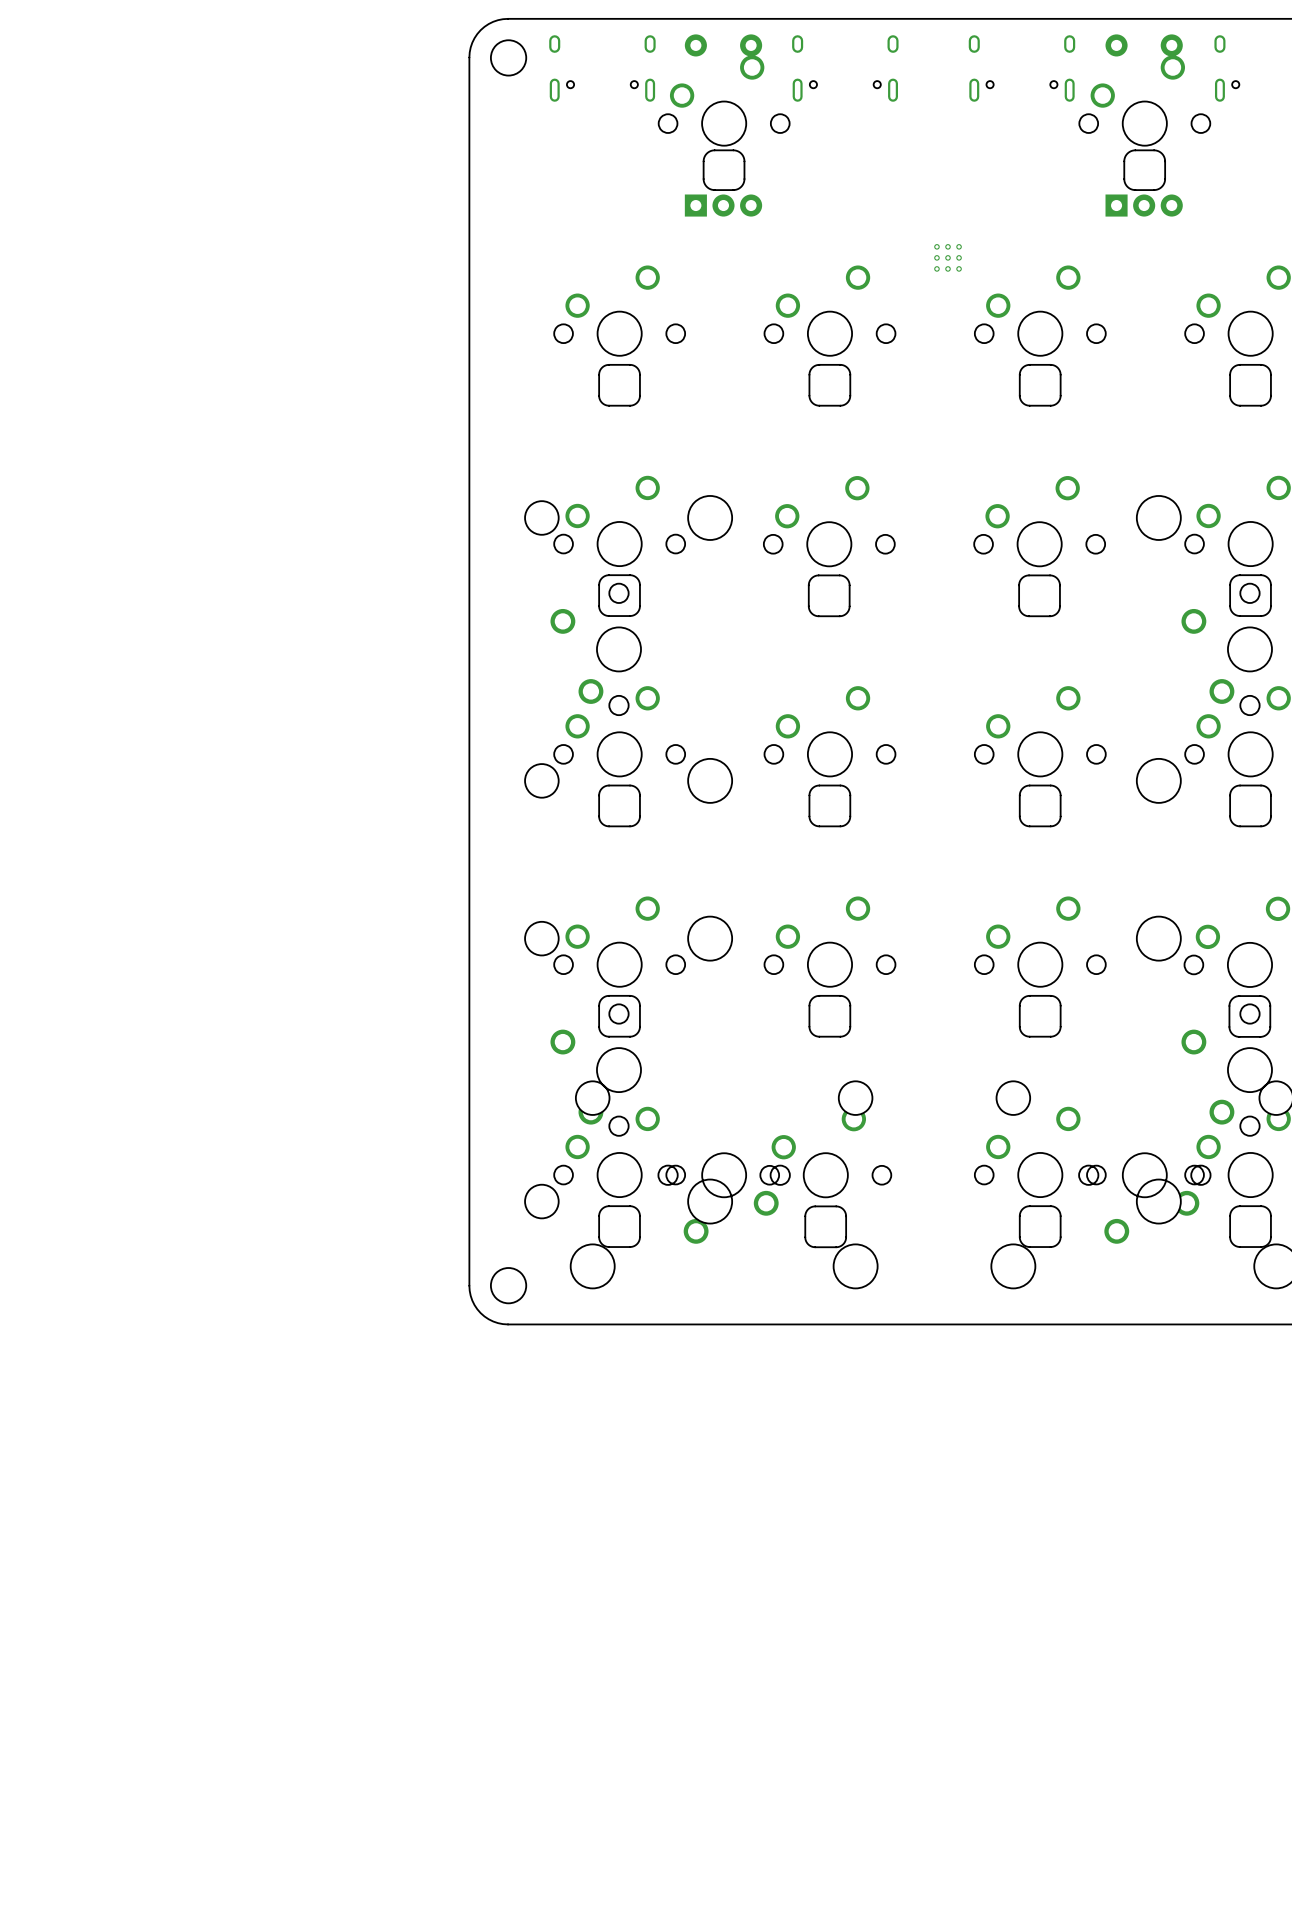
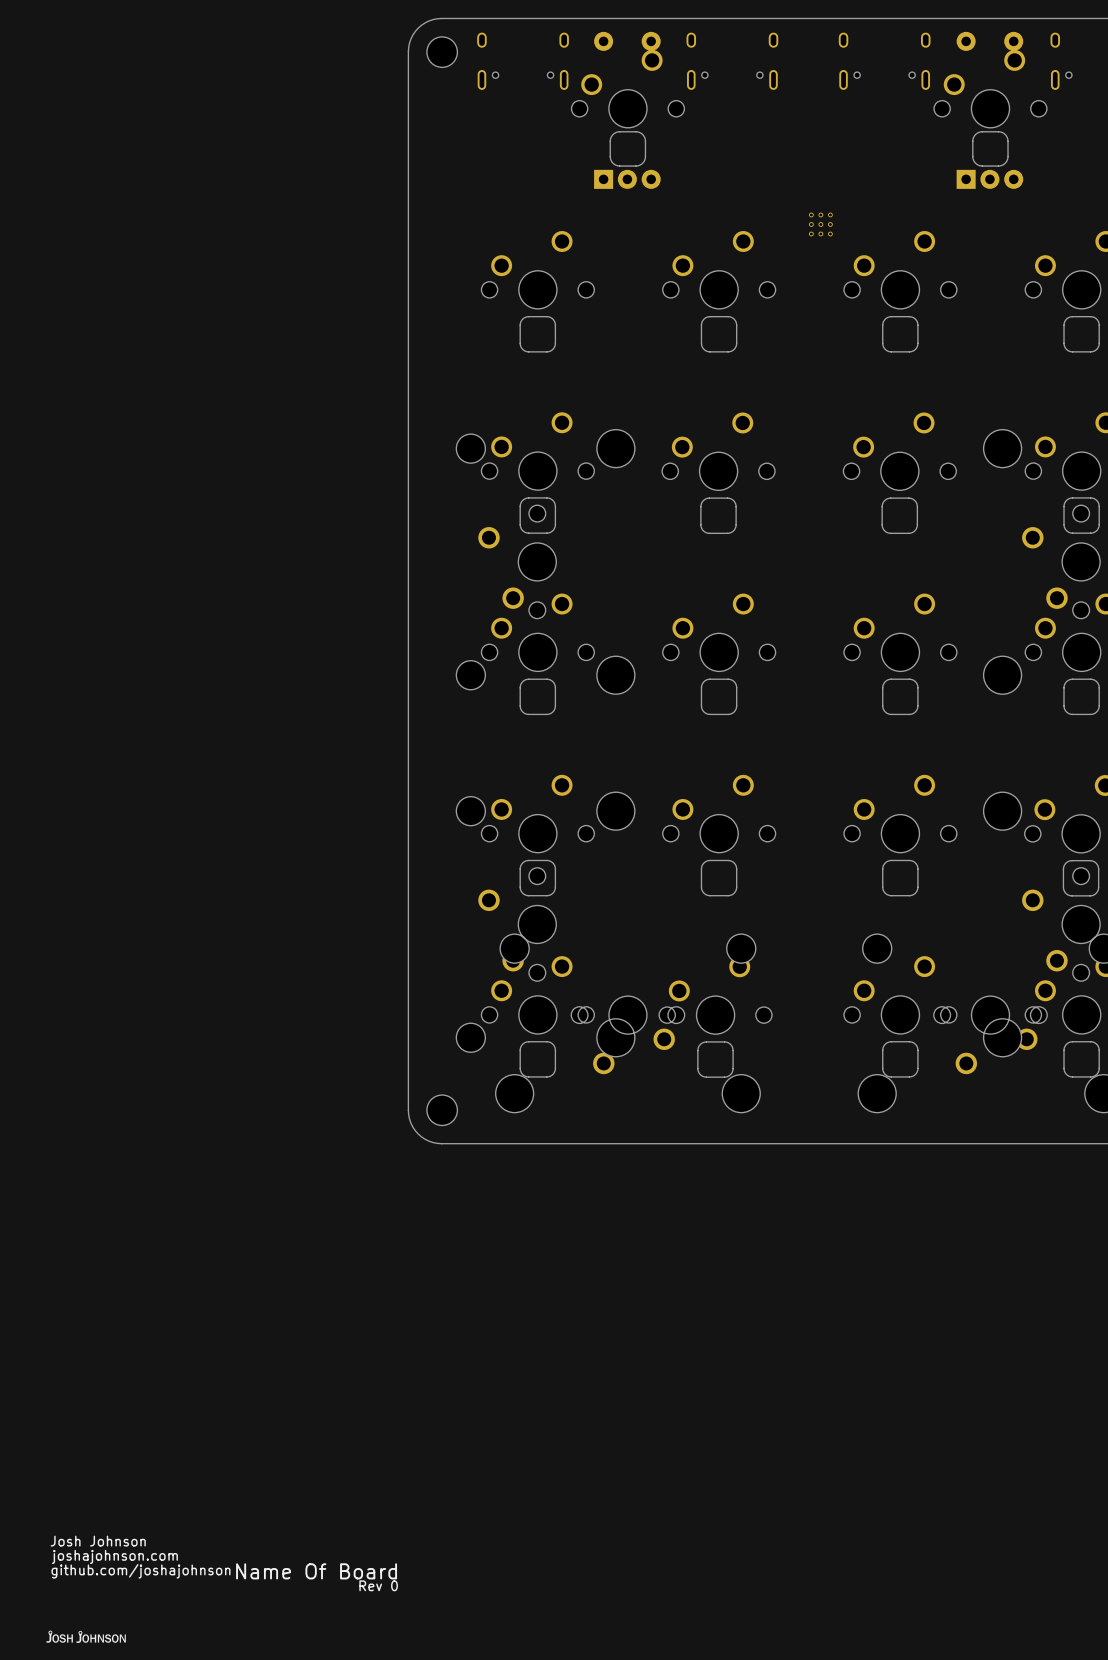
drawing: none -> [50, 1535, 398, 1592]
drawing: none -> [46, 1630, 126, 1643]

